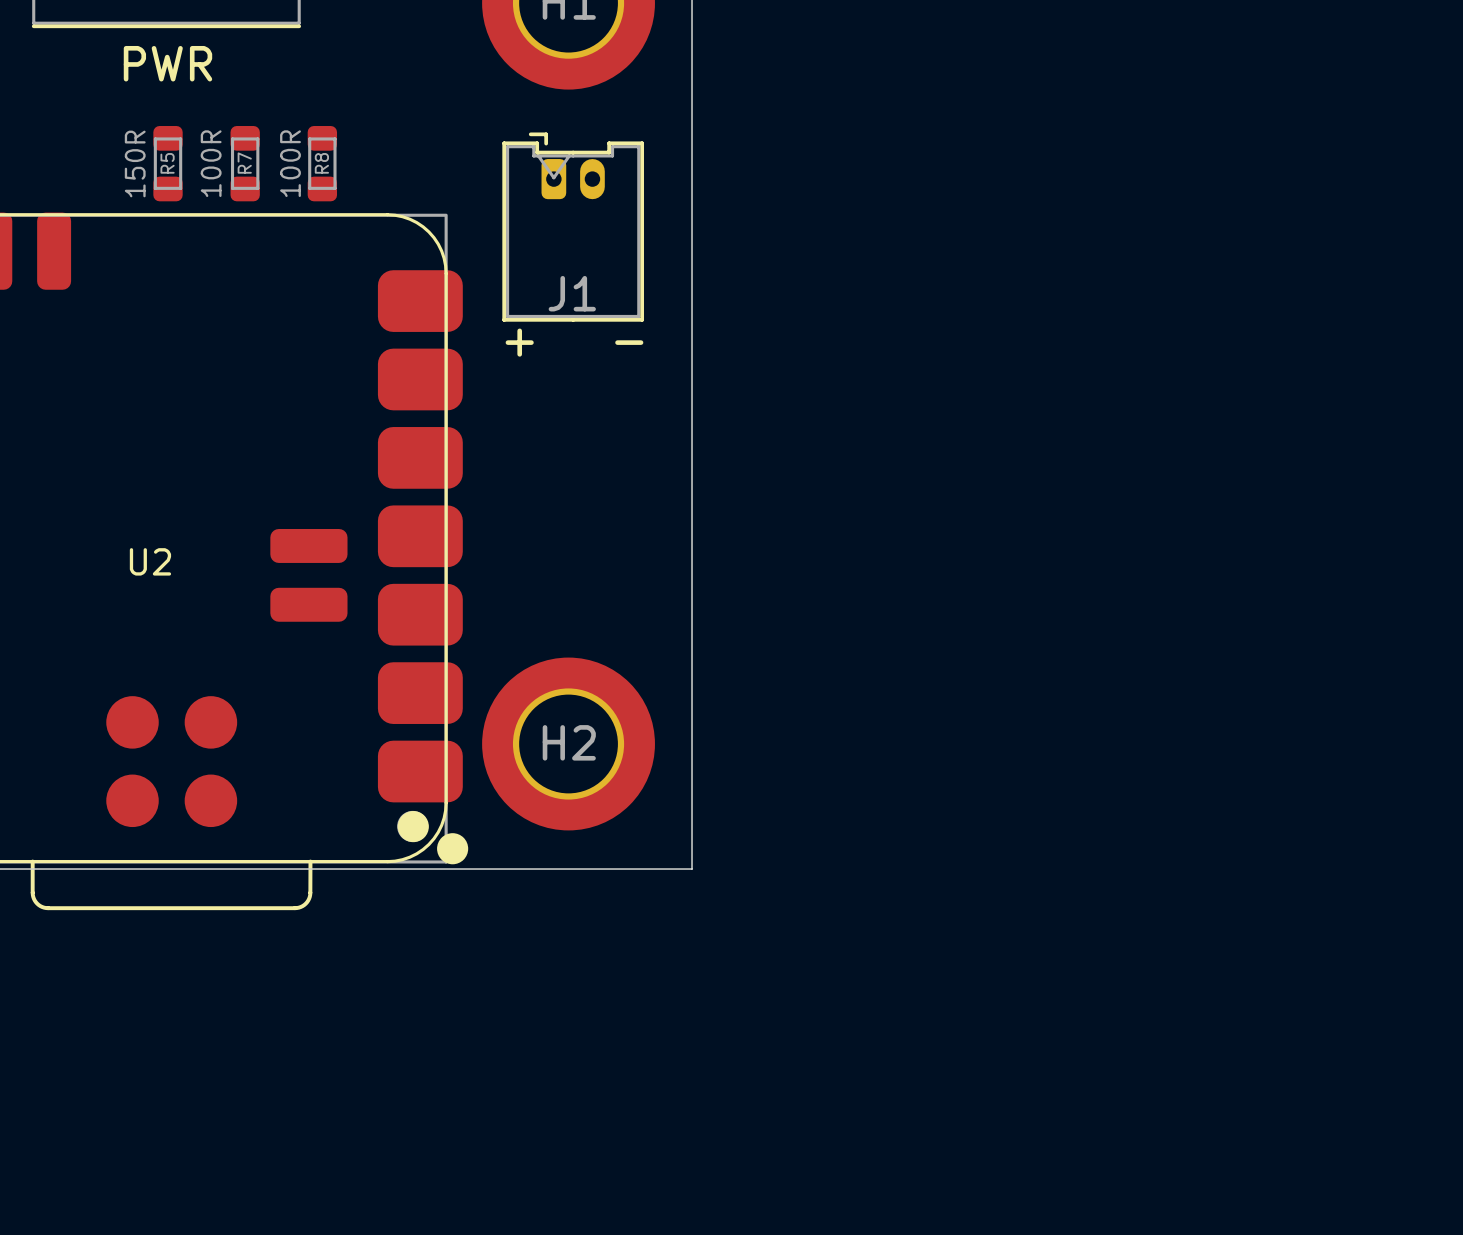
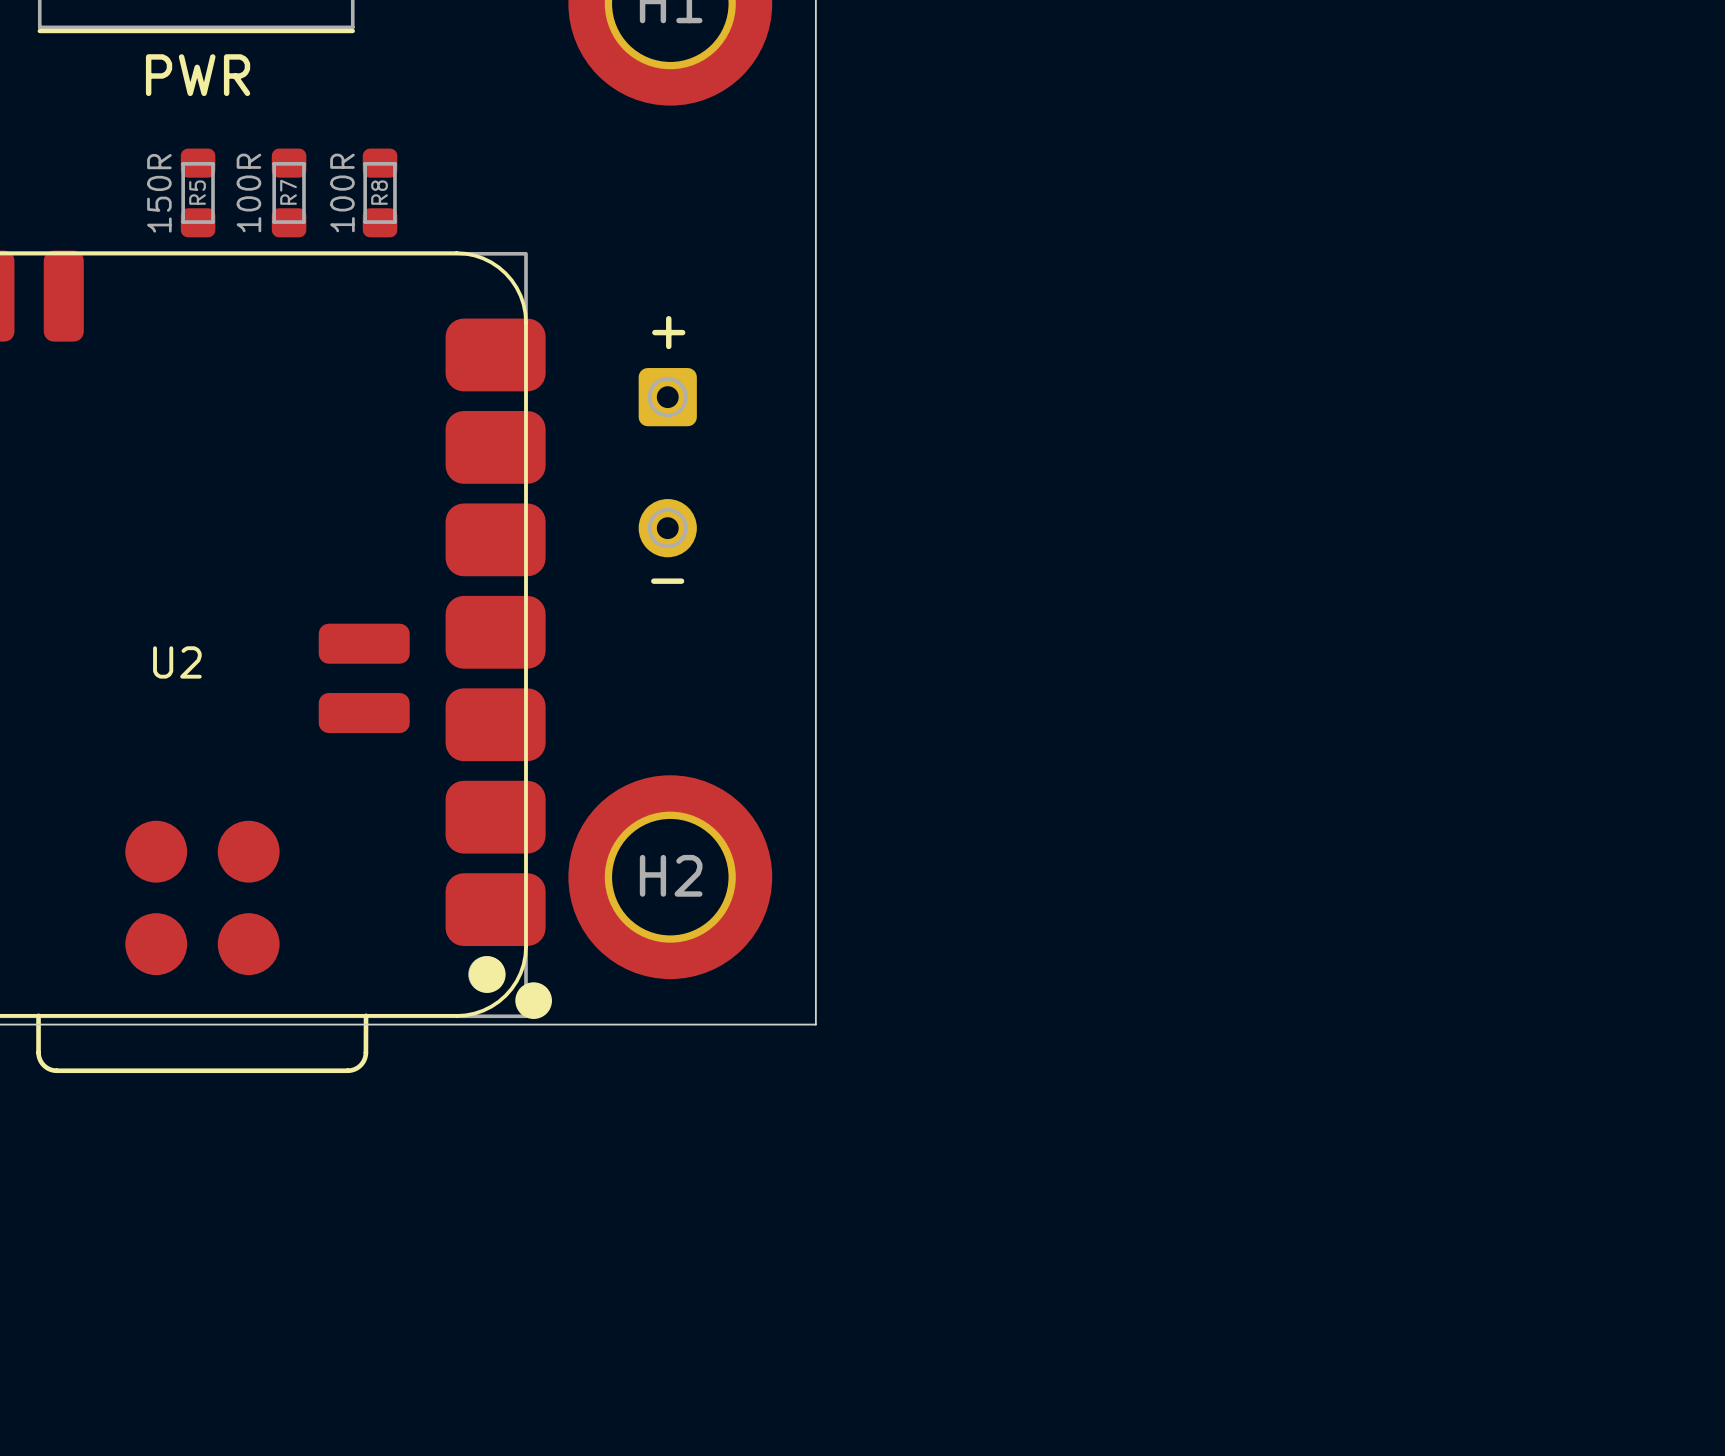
J1: (573, 227) -> none
text position: + (519, 342) -> + (668, 332)
text position: - (629, 342) -> - (667, 581)
part: none -> (667, 462)

